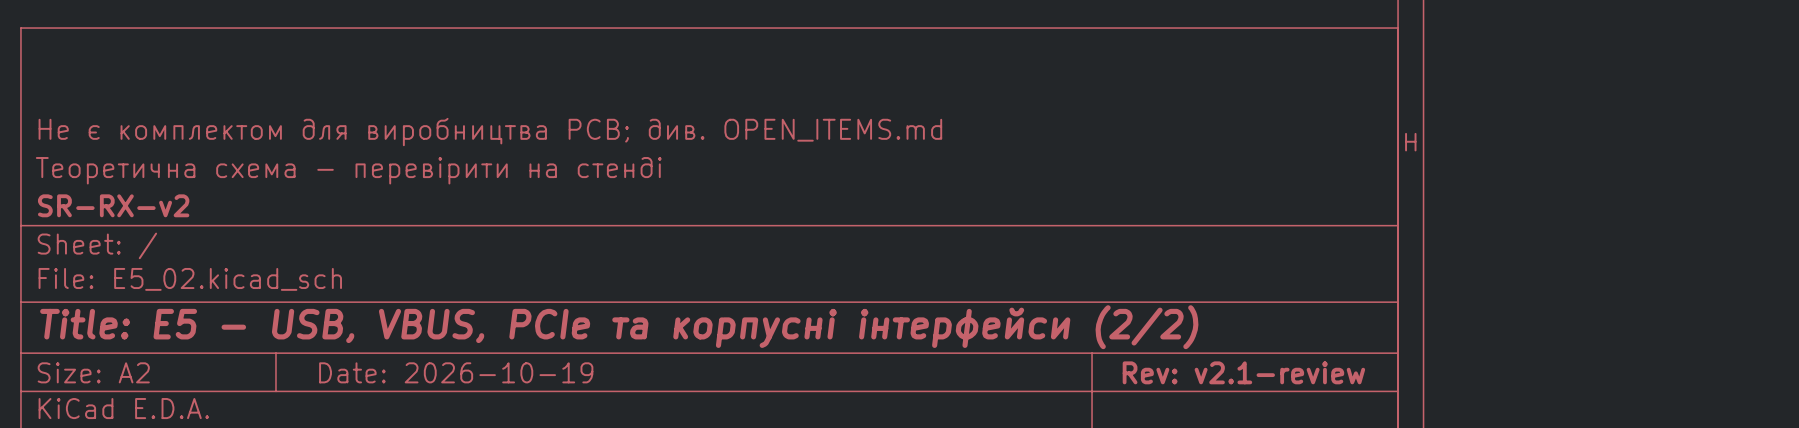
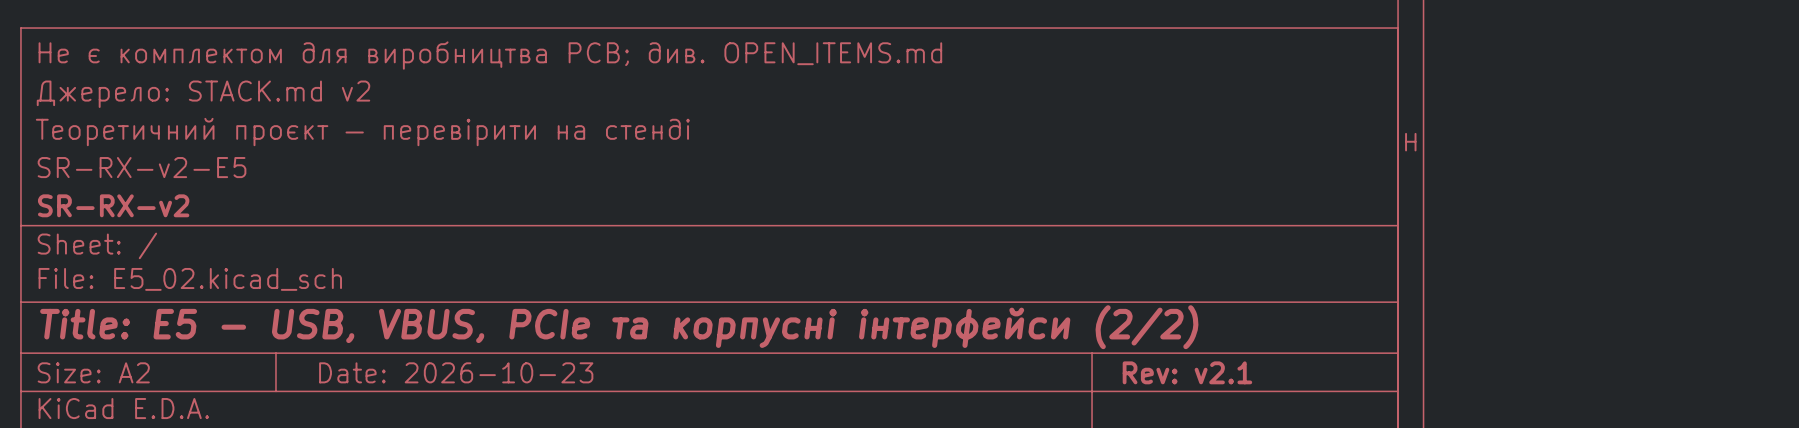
title block: none -> Не є комплектом для виробництва PCB; див. OPEN_ITEMS.md (490, 55)
title block: none -> Джерело: STACK.md v2 (203, 94)
title block: Не є комплектом для виробництва PCB; див. OPEN_ITEMS.md (490, 132) -> Теоретичний проєкт — перевірити на стенді (362, 132)
title block: Теоретична схема - перевірити на стенді (348, 170) -> SR-RX-v2-E5 (142, 167)
title block: Date: 2026-10-19 (456, 372) -> Date: 2026-10-23 (456, 372)
title block: Rev: v2.1-review (1243, 372) -> Rev: v2.1 (1187, 372)

